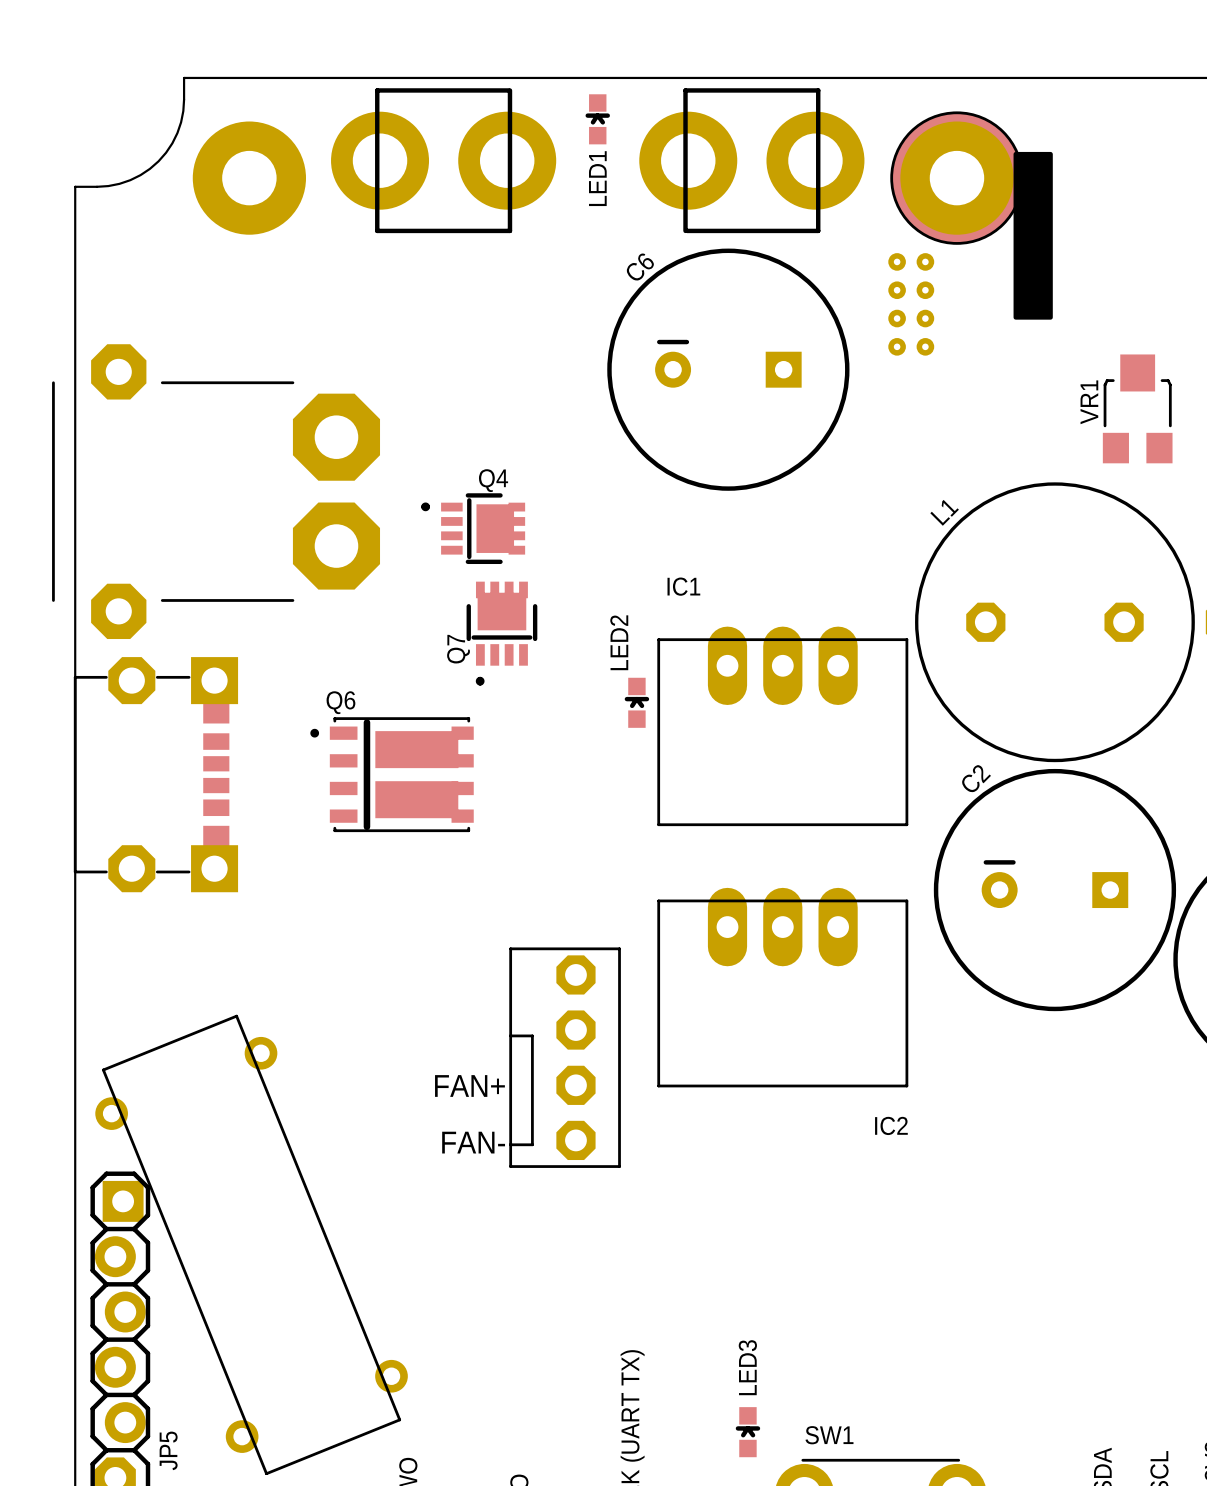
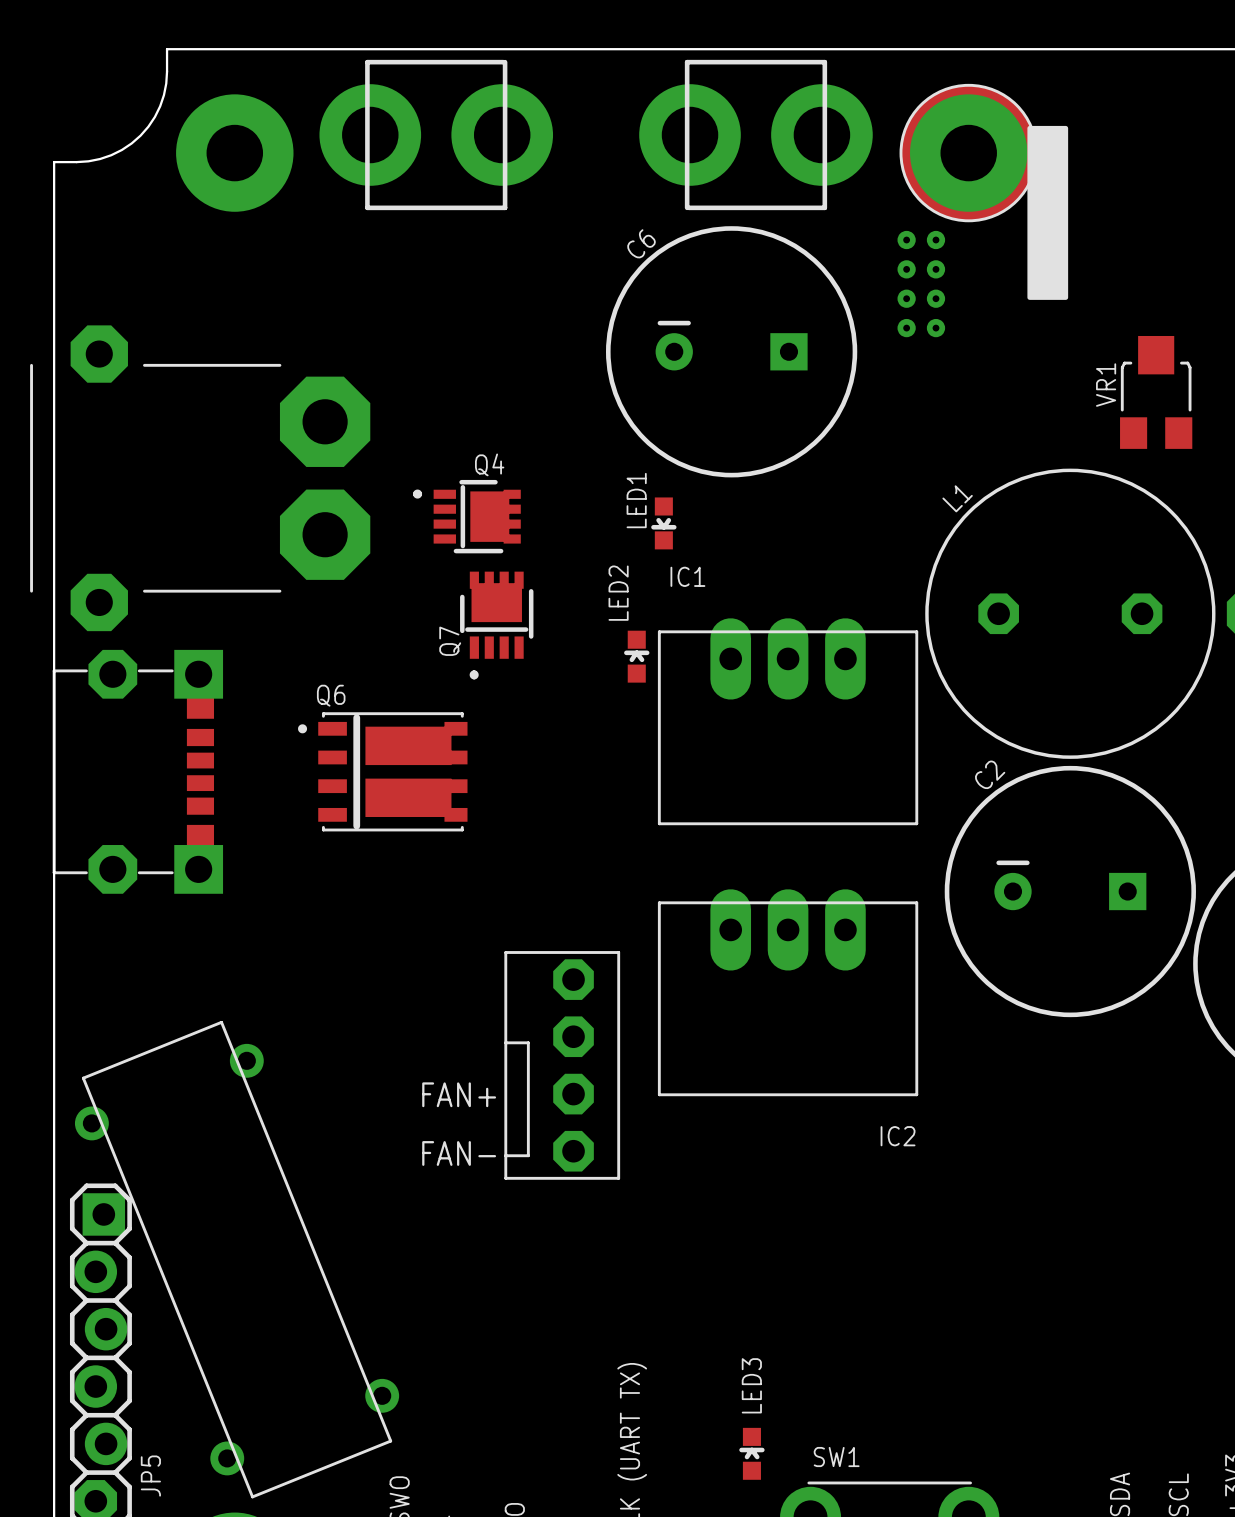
LED1 rotation: 0° (597, 119) -> 180° (663, 523)
LED1 position: (597, 119) -> (663, 523)
LED1 name position: LED1 (597, 178) -> LED1 (636, 500)
Q4 footprint: [421, 493, 526, 565] -> [413, 479, 521, 554]
Q7 footprint: [466, 581, 538, 686] -> [460, 571, 534, 680]
LED2 position: (636, 702) -> (636, 656)

